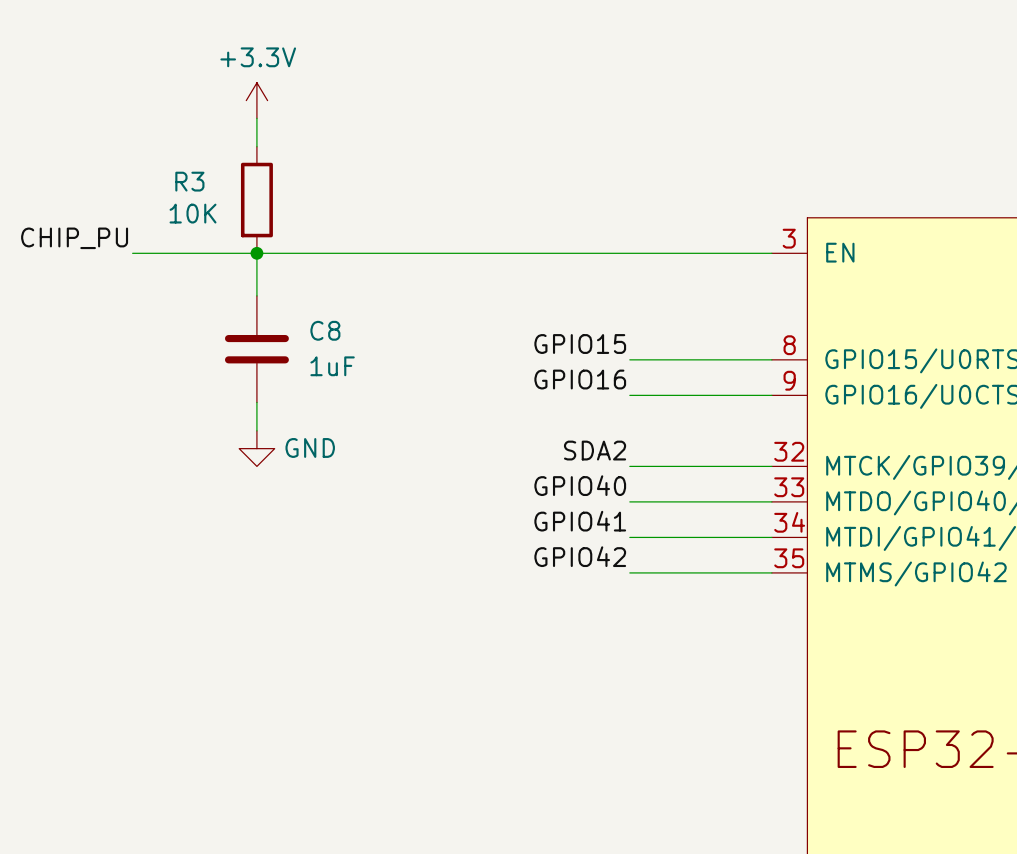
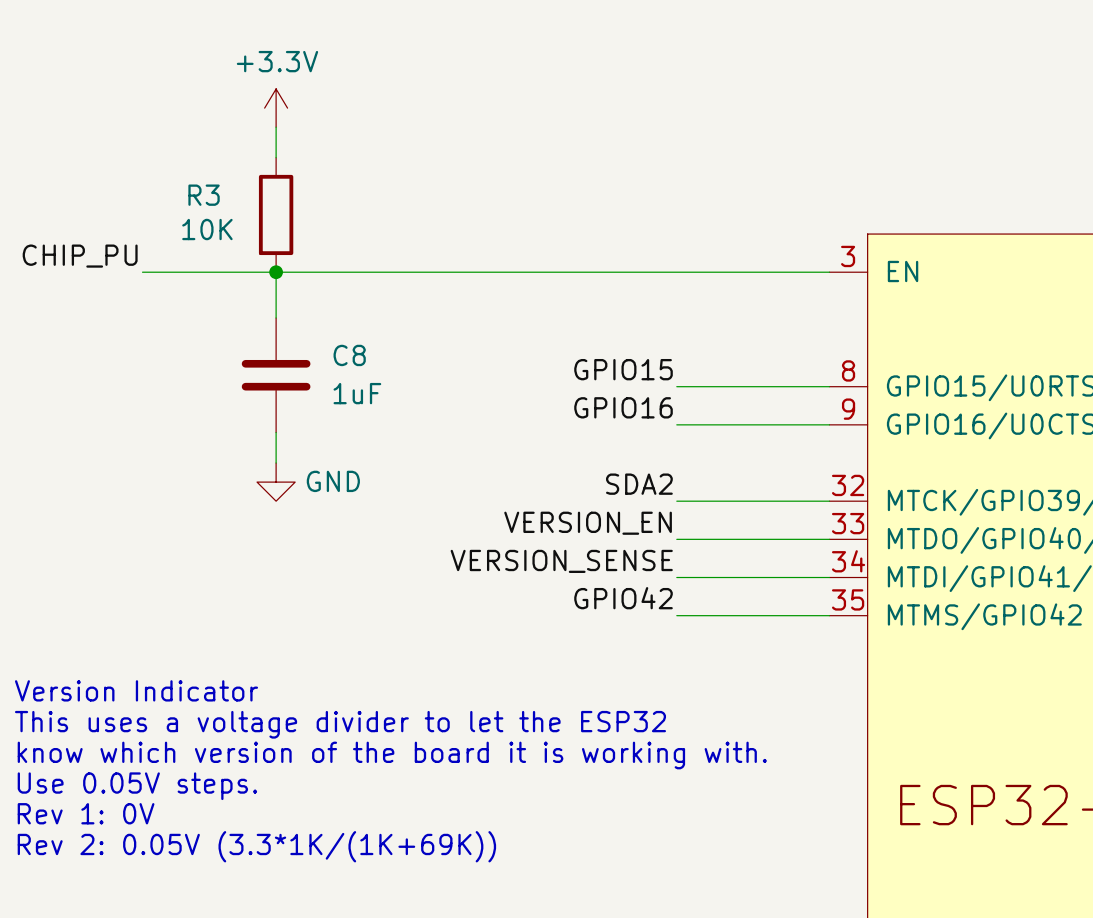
label: GPIO40 (580, 485) -> VERSION_EN (588, 523)
label: GPIO41 (580, 521) -> VERSION_SENSE (561, 561)
text: none -> Version Indicator (136, 690)
text: none -> This uses a voltage divider to let the ESP32 (340, 724)
text: none -> know which version of the board it is working with. (392, 755)
text: none -> Use 0.05V steps. (137, 786)
text: none -> Rev 1: 0V (86, 813)
text: none -> Rev 2: 0.05V (3.3*1K/(1K+69K)) (256, 846)

